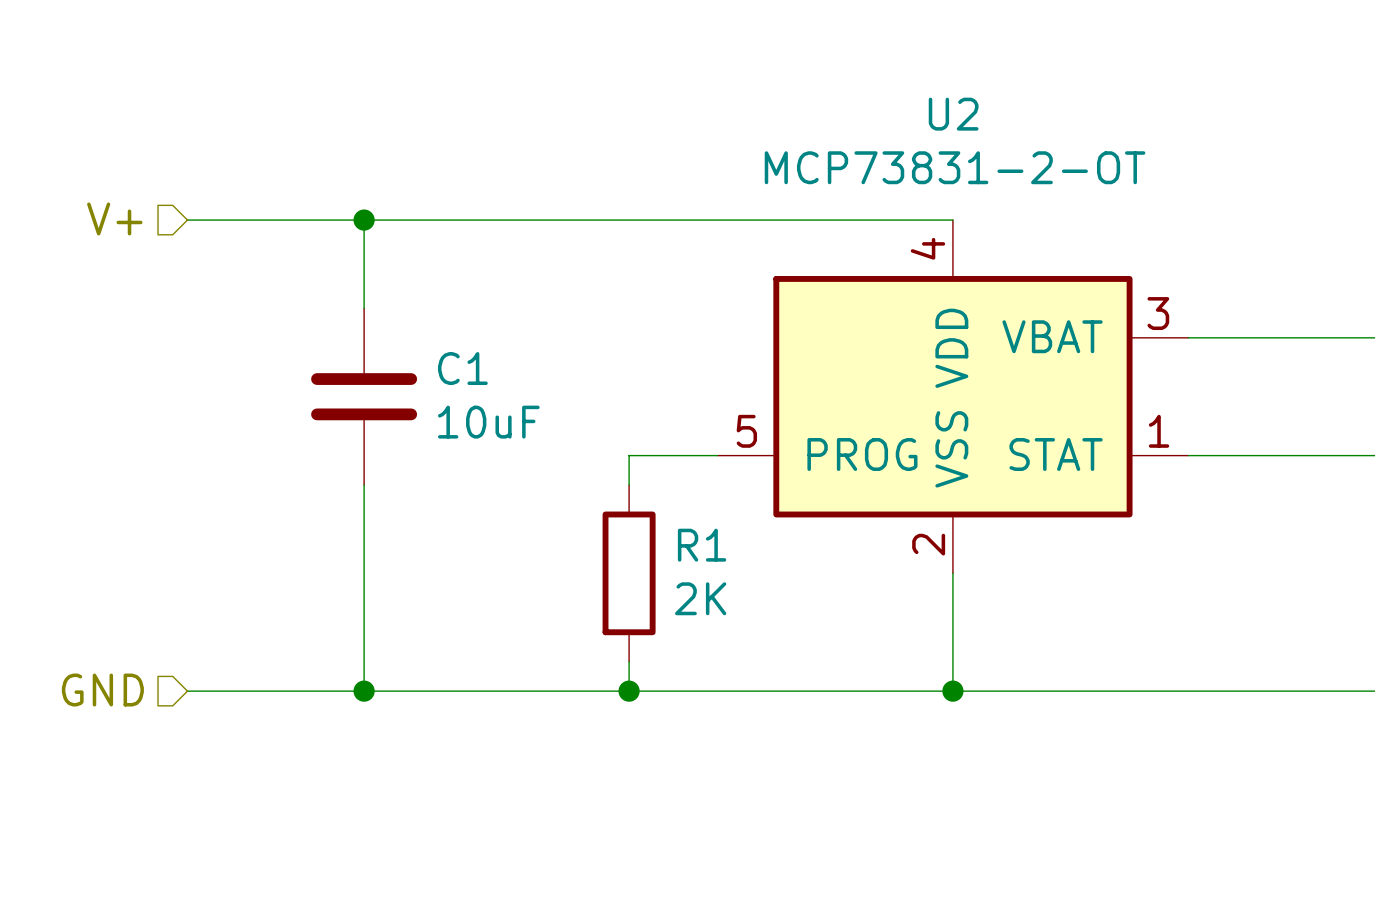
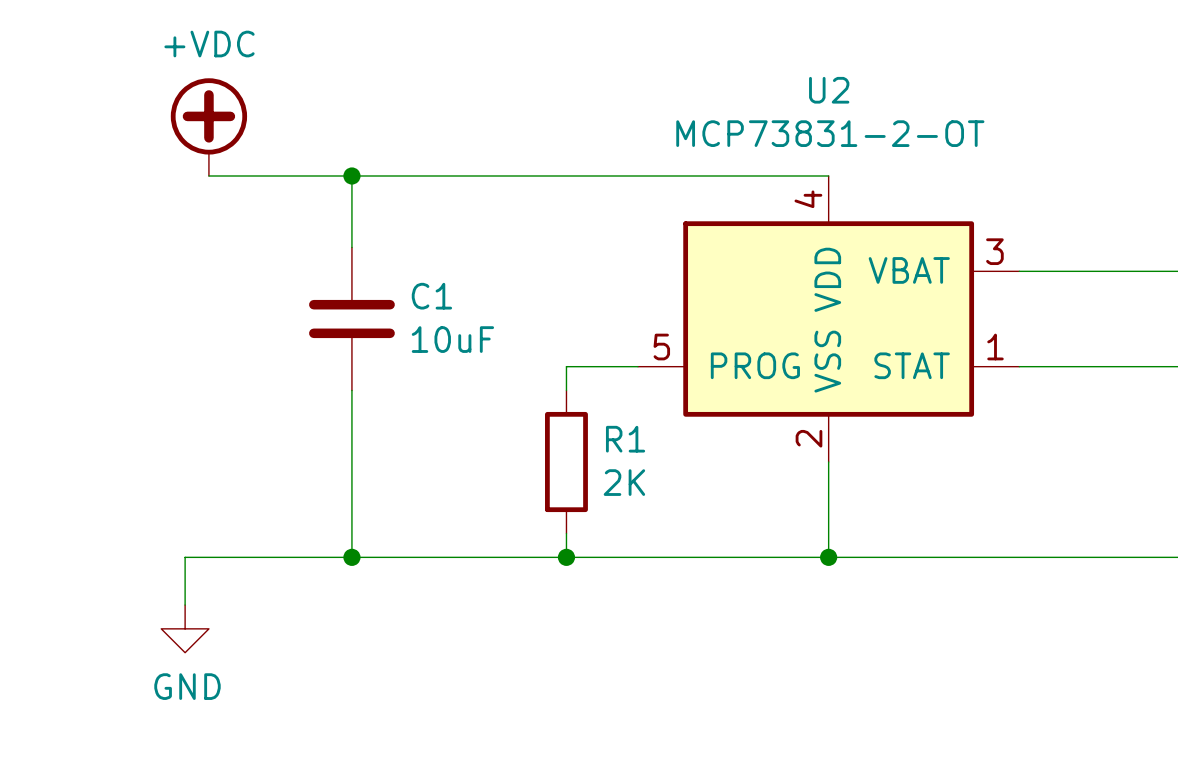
power symbol: none -> +VDC (208, 127)
hierarchical label: V+ (114, 218) -> none
hierarchical label: GND (102, 690) -> none
wire: none -> (208, 557) (185, 557) (185, 605)
power symbol: none -> GND (185, 628)

